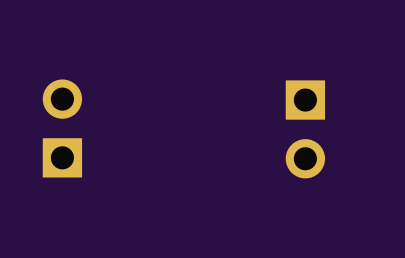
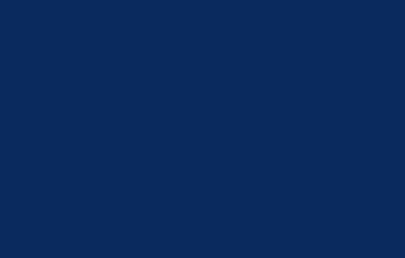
part: (62, 128) -> none
part: (305, 129) -> none

